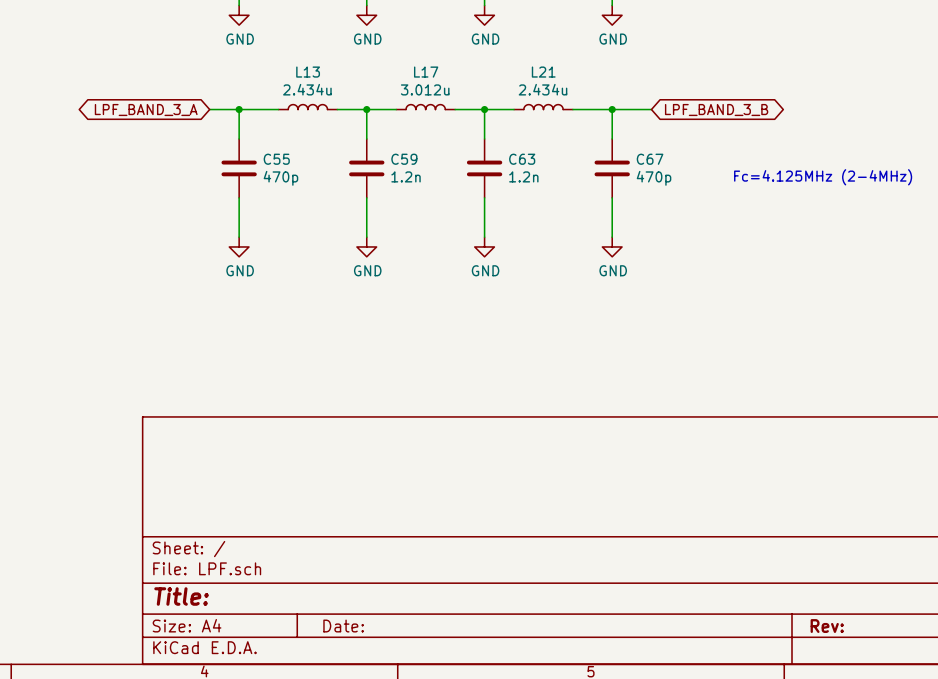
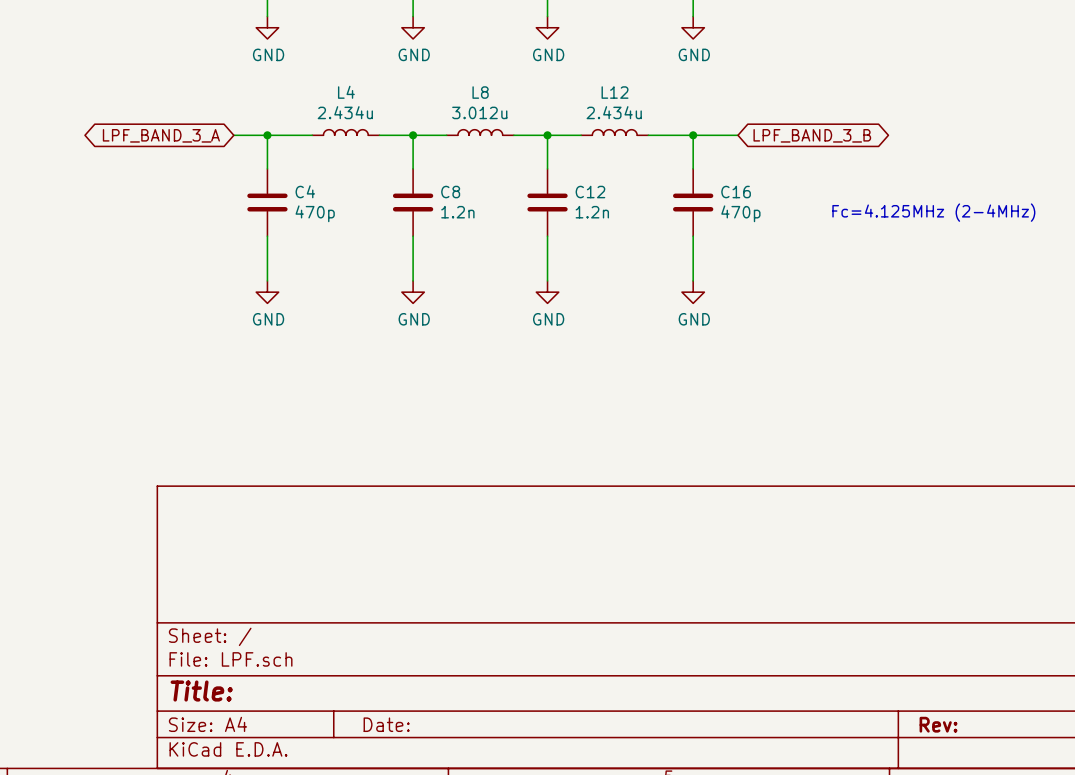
L13 name: L13 (308, 72) -> L4 (346, 92)
L17 name: L17 (426, 72) -> L8 (480, 92)
L21 name: L21 (543, 72) -> L12 (615, 92)
C55 name: C55 (276, 159) -> C4 (305, 191)
C59 name: C59 (404, 159) -> C8 (450, 192)
C63 name: C63 (522, 159) -> C12 (590, 192)
C67 name: C67 (650, 159) -> C16 (736, 192)

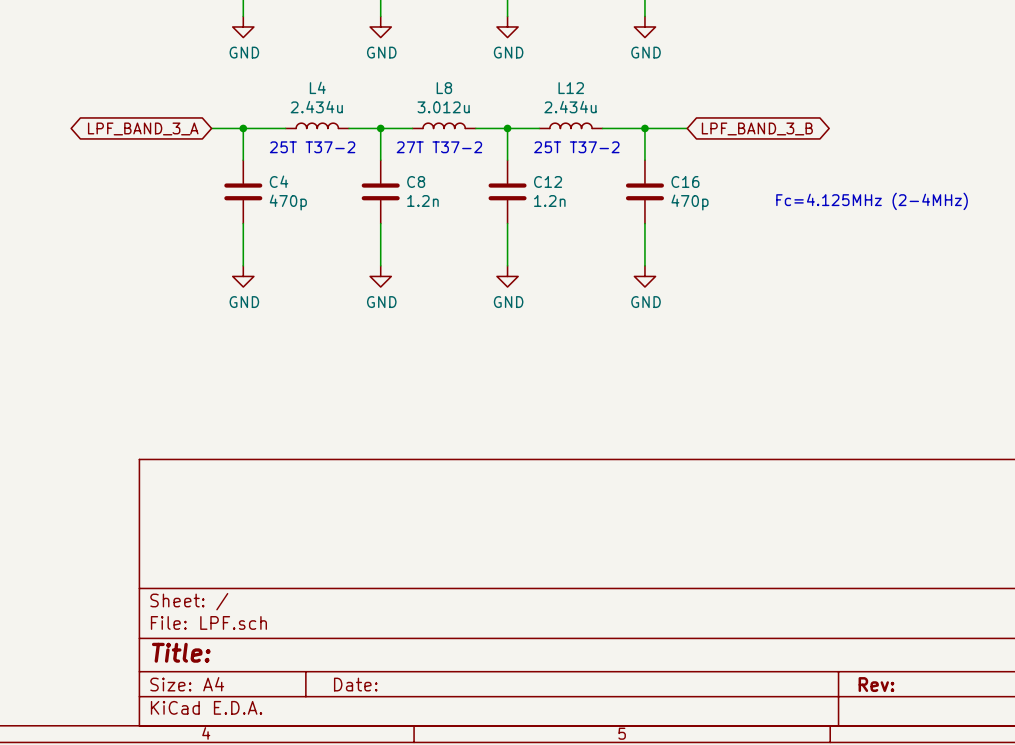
text: none -> 25T T37-2 (312, 147)
text: none -> 27T T37-2 (439, 147)
text: none -> 25T T37-2 (576, 147)

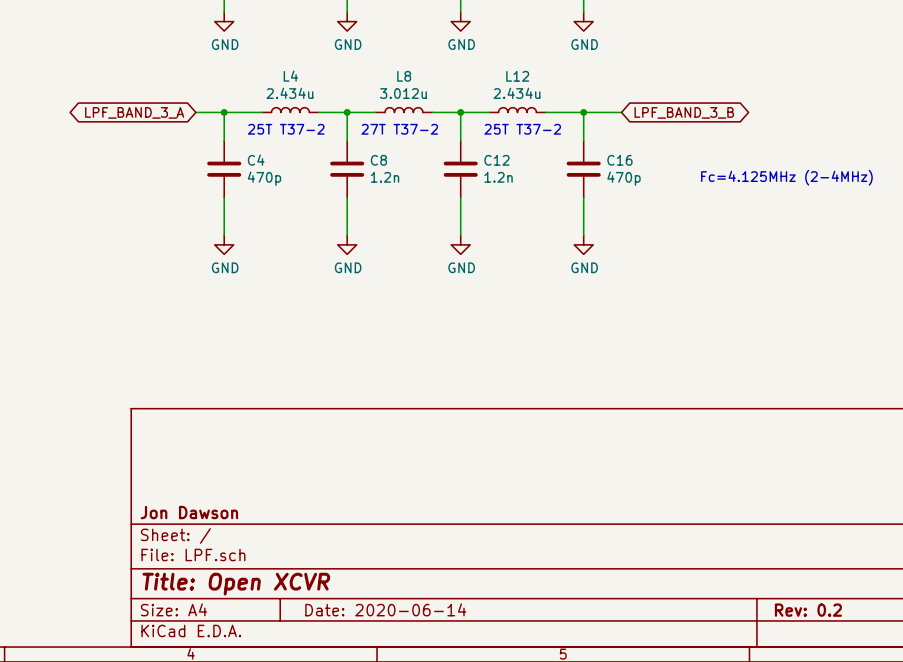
title block: none -> Jon Dawson (189, 512)
title block: Title: (181, 652) -> Title: Open XCVR (236, 584)
title block: Date: (355, 684) -> Date: 2020-06-14 (385, 609)
title block: Rev: (876, 684) -> Rev: 0.2 (808, 610)

